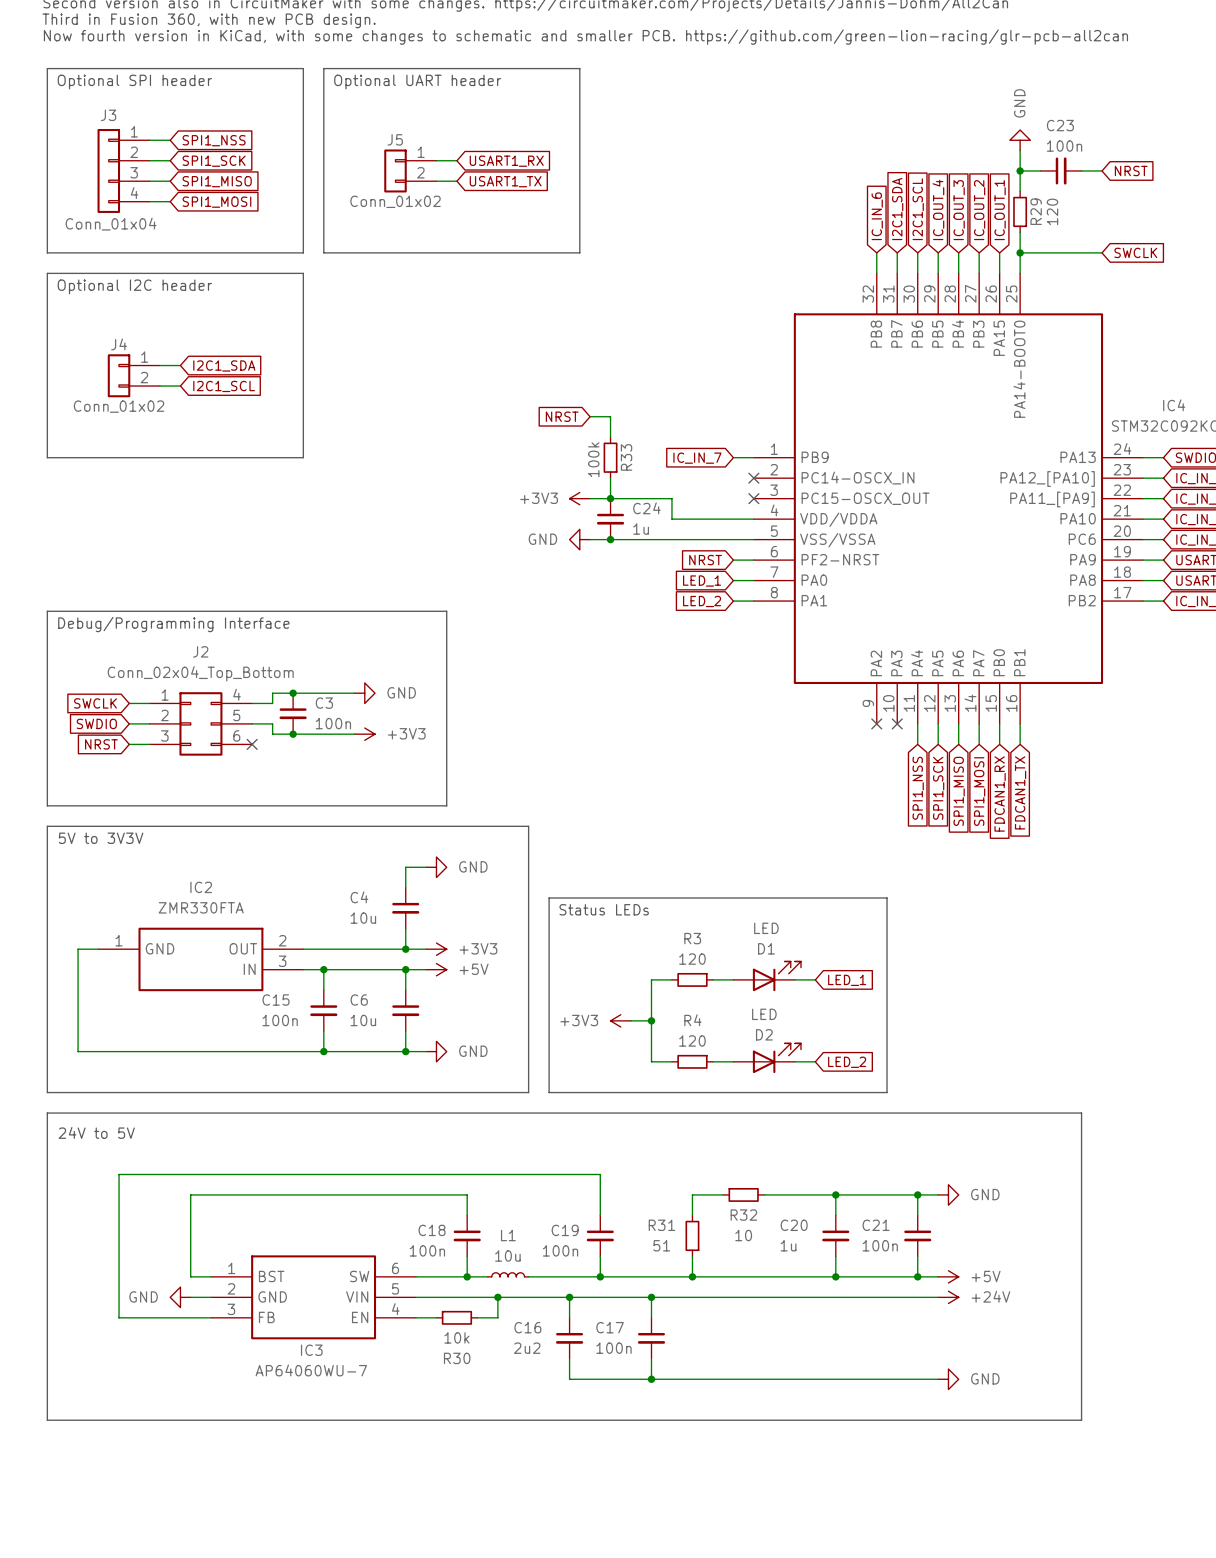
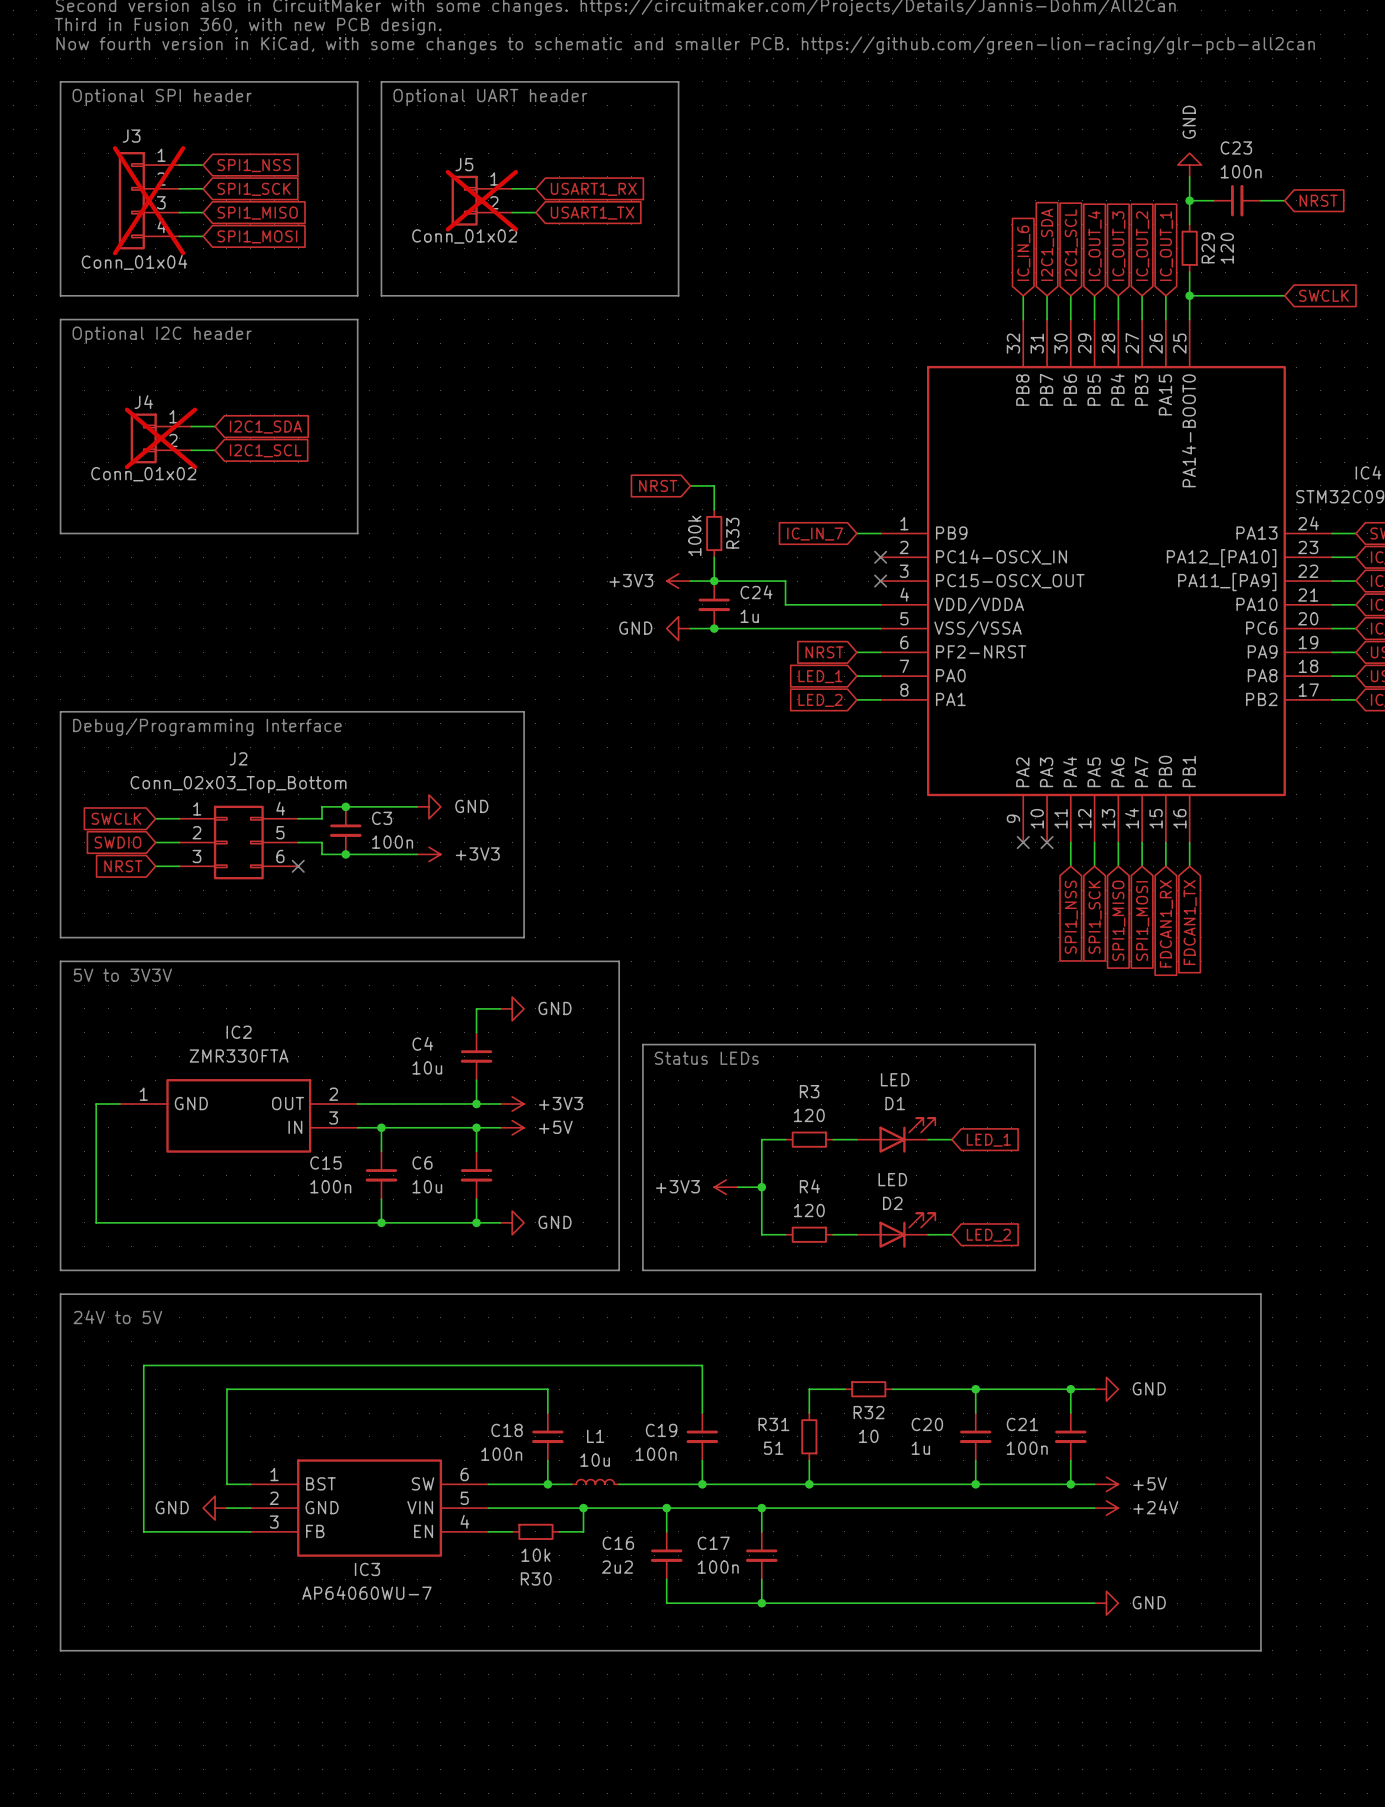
J3 do-not-place cross: none -> (149, 200)
J5 do-not-place cross: none -> (481, 200)
J4 do-not-place cross: none -> (160, 438)
J2 value: Conn_02x04_Top_Bottom (200, 673) -> Conn_02x03_Top_Bottom (238, 784)

